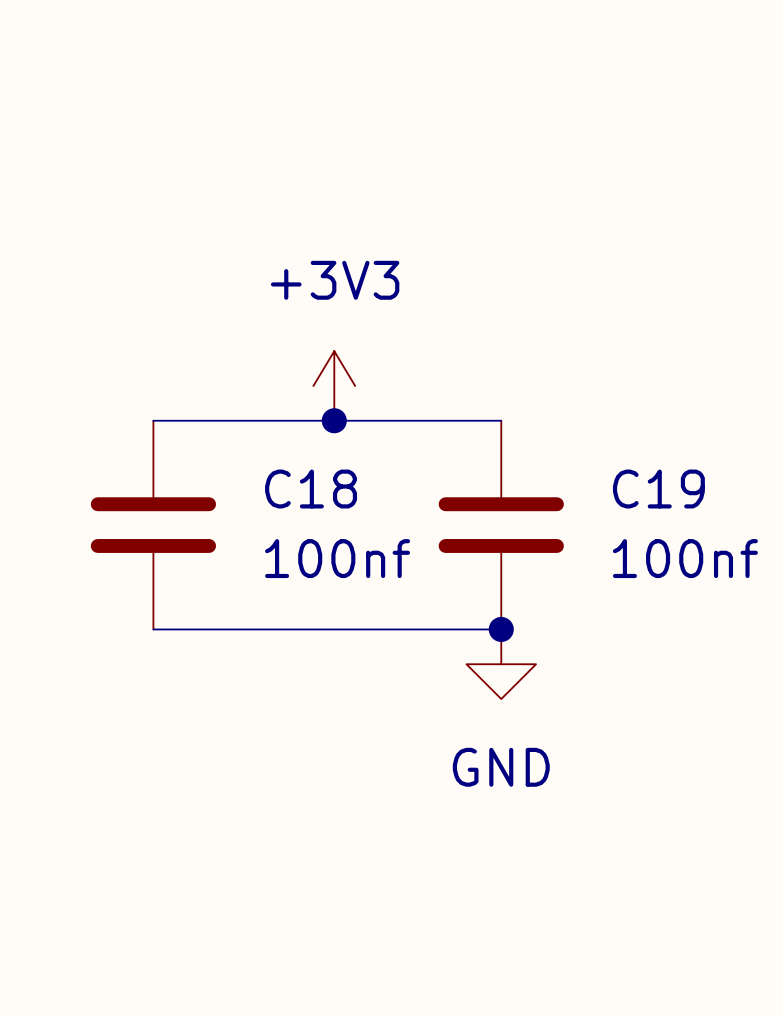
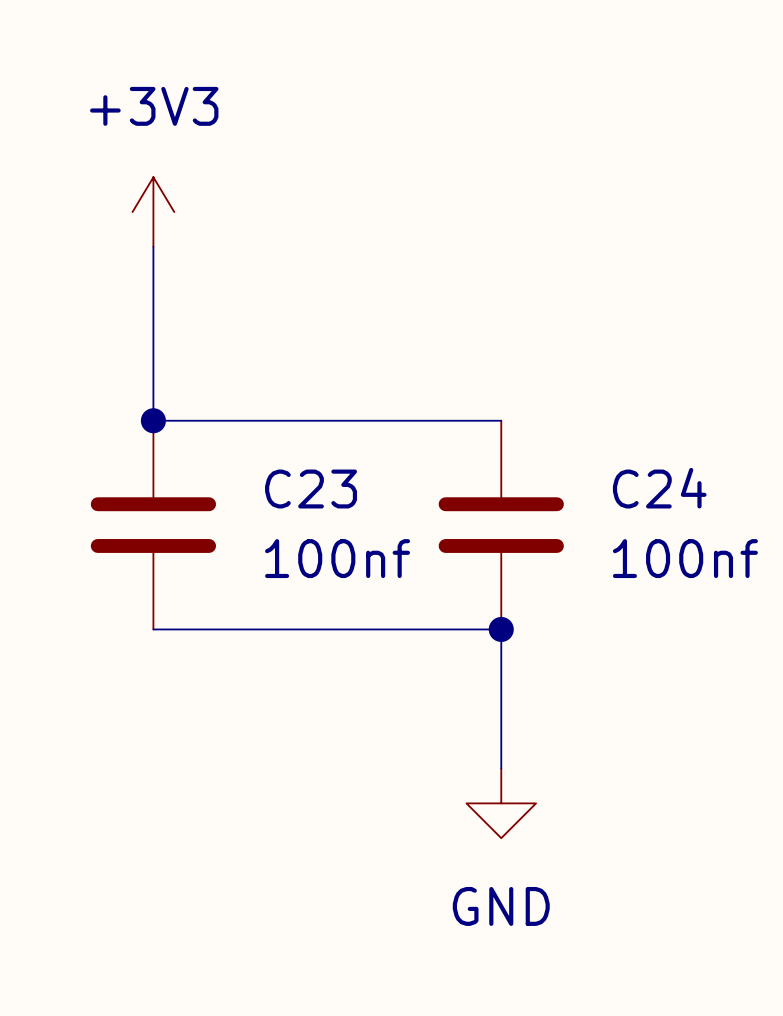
wire: none -> (153, 246) (153, 420)
power symbol position: +3V3 (334, 385) -> +3V3 (153, 212)
junction: none -> (153, 420)
junction: (334, 420) -> none
C18 name: C18 (311, 489) -> C23 (311, 489)
C19 name: C19 (658, 489) -> C24 (659, 488)
wire: none -> (501, 629) (501, 768)
power symbol position: GND (501, 664) -> GND (501, 803)

